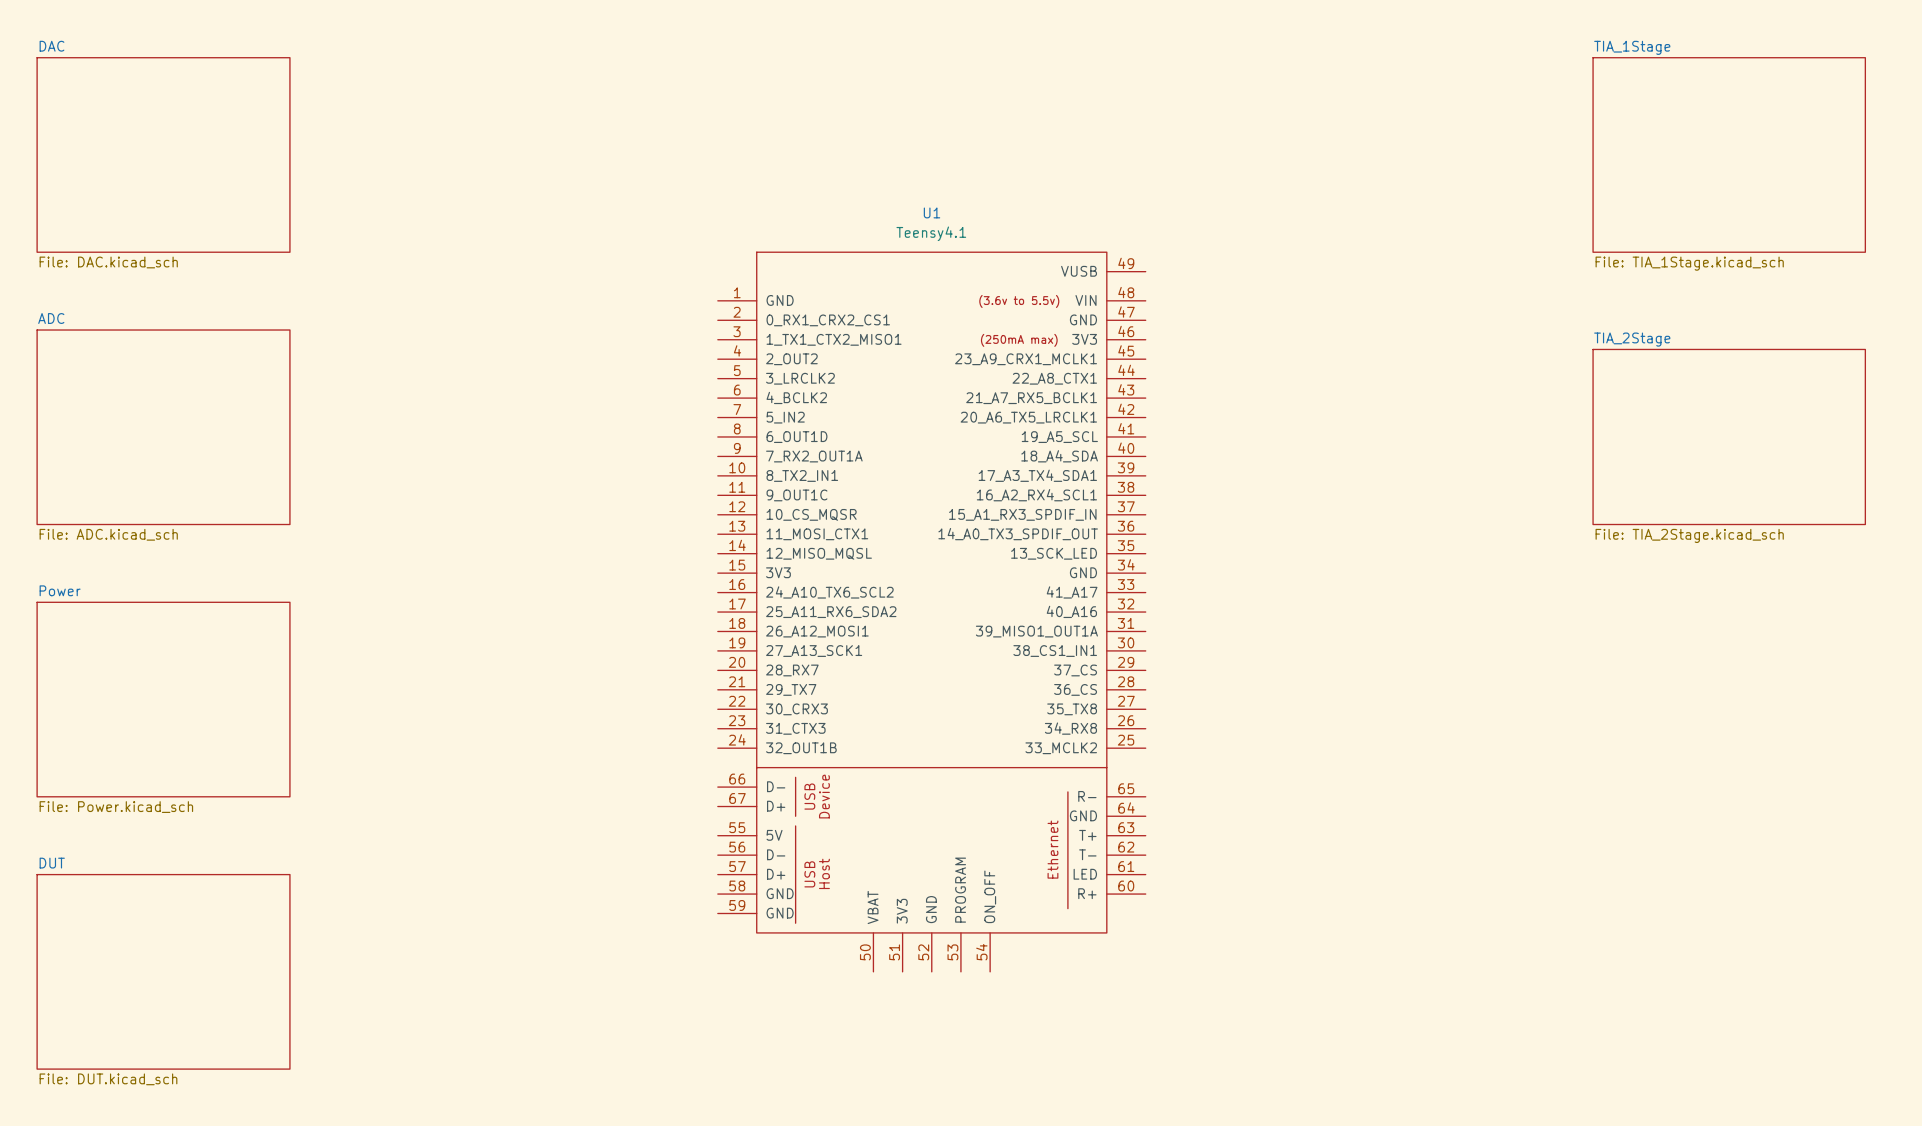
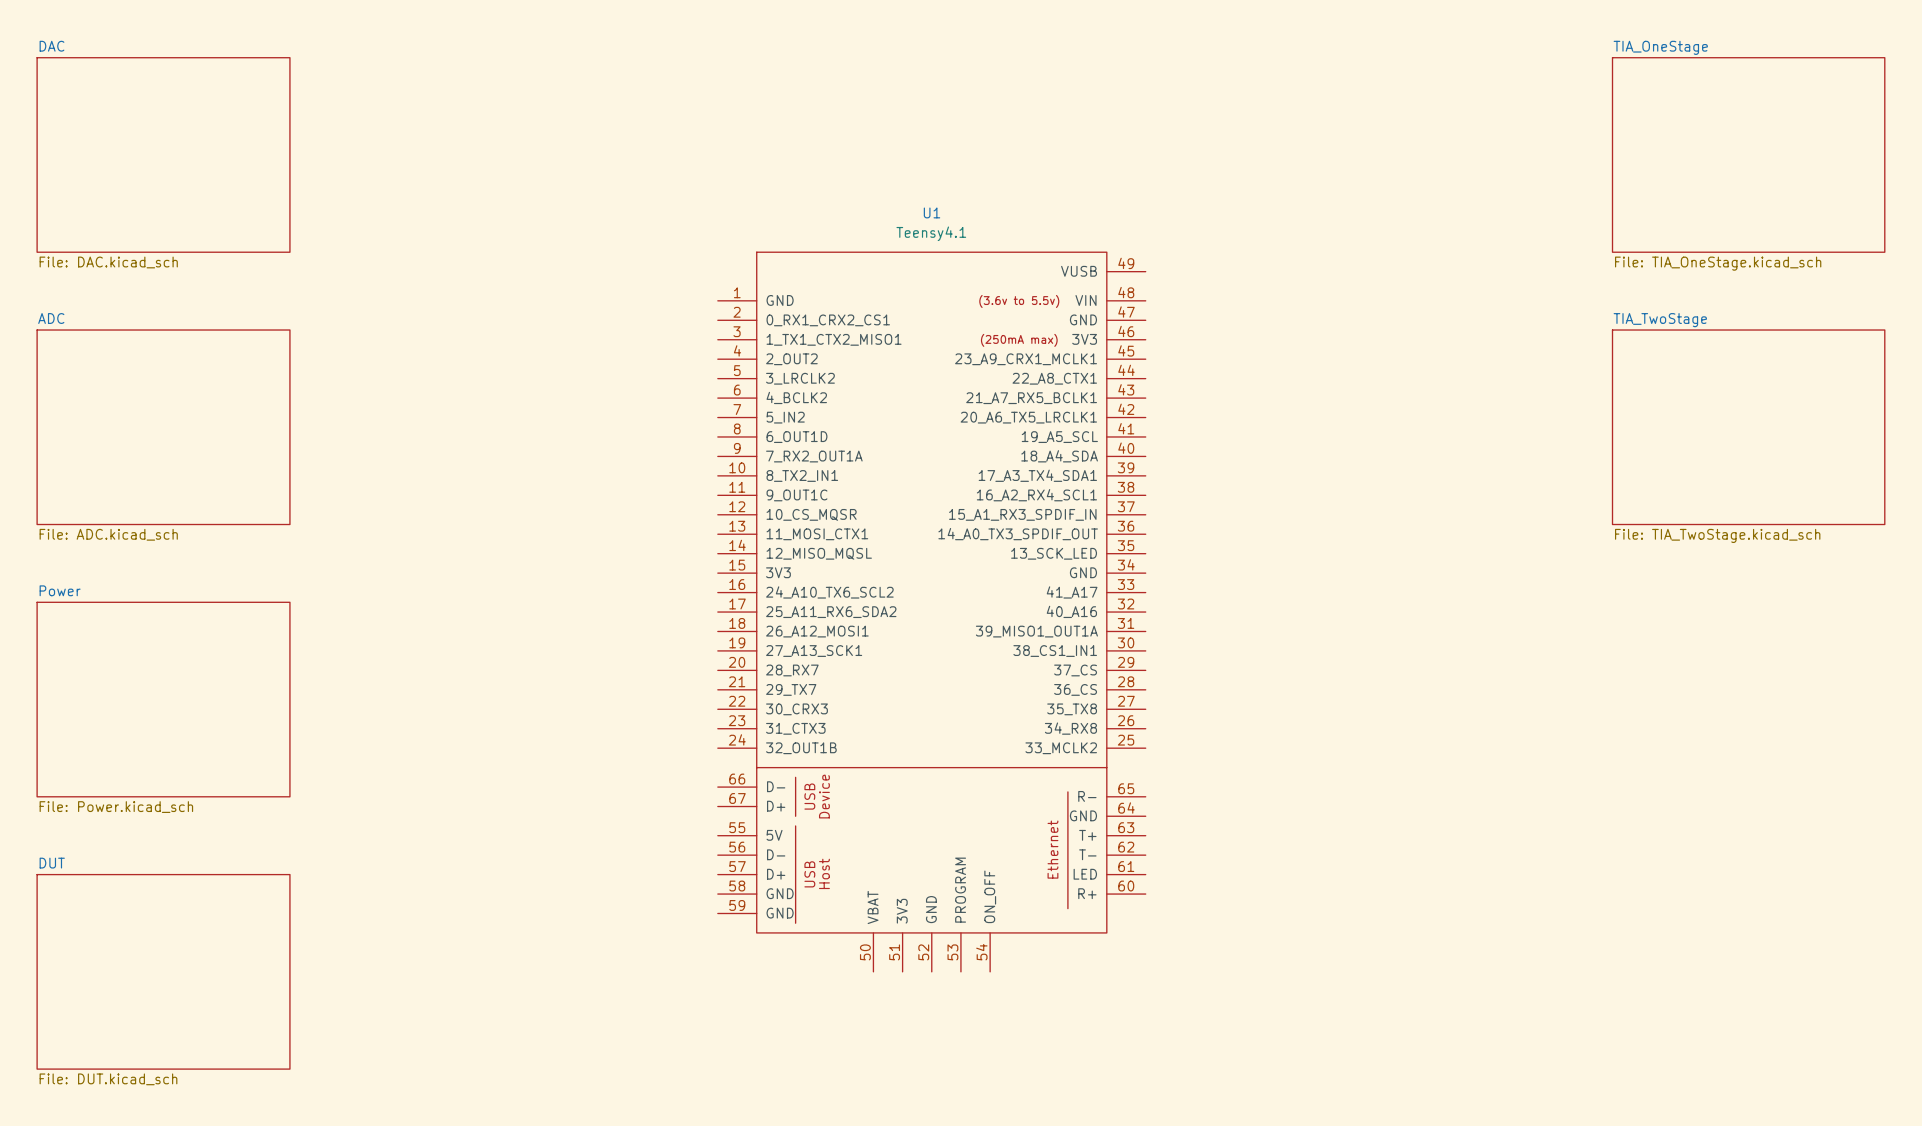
sheet TIA_1Stage: File: TIA_1Stage.kicad_sch (1729, 154) -> none
sheet TIA_OneStage: none -> File: TIA_OneStage.kicad_sch (1748, 154)
sheet TIA_TwoStage: none -> File: TIA_TwoStage.kicad_sch (1748, 427)
sheet TIA_2Stage: File: TIA_2Stage.kicad_sch (1729, 436) -> none

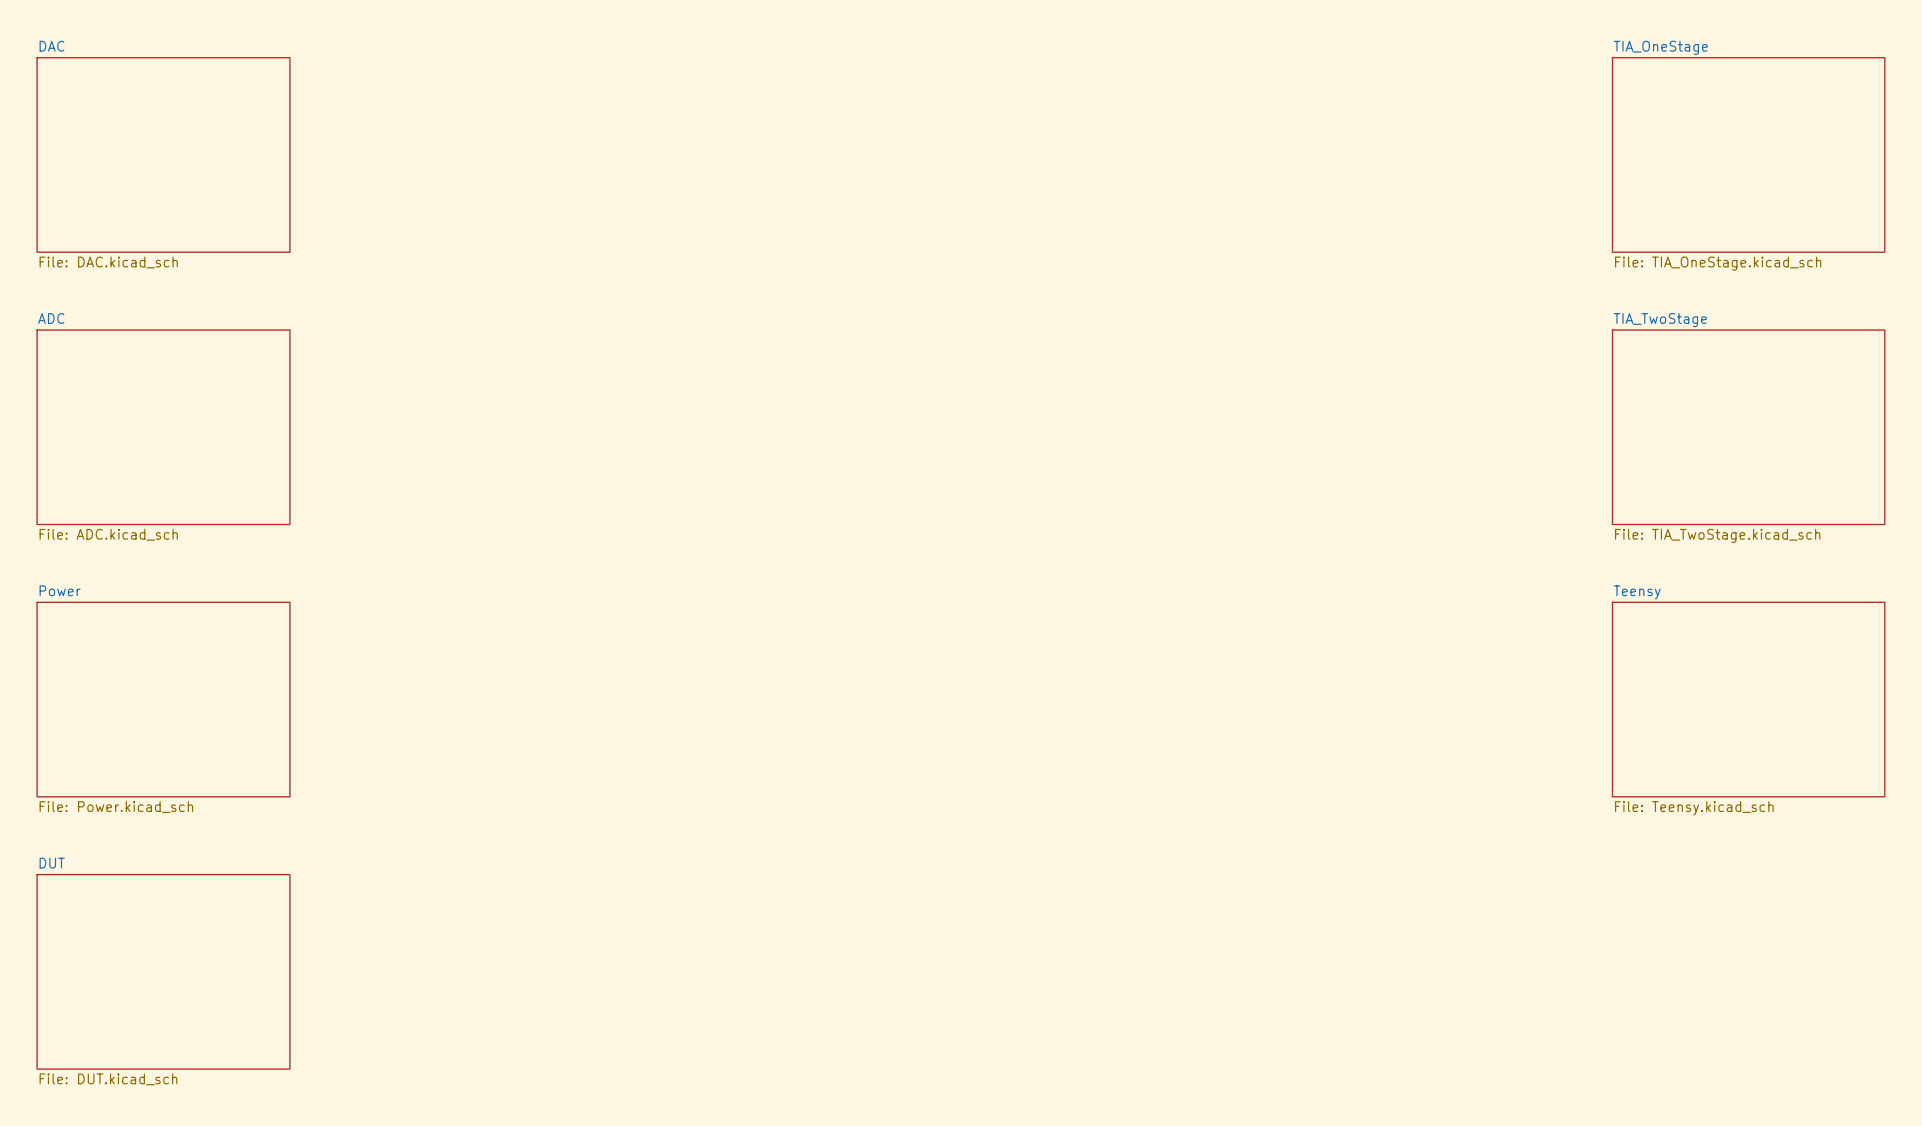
U1: Teensy4.1 (931, 612) -> none
sheet Teensy: none -> File: Teensy.kicad_sch (1748, 699)

